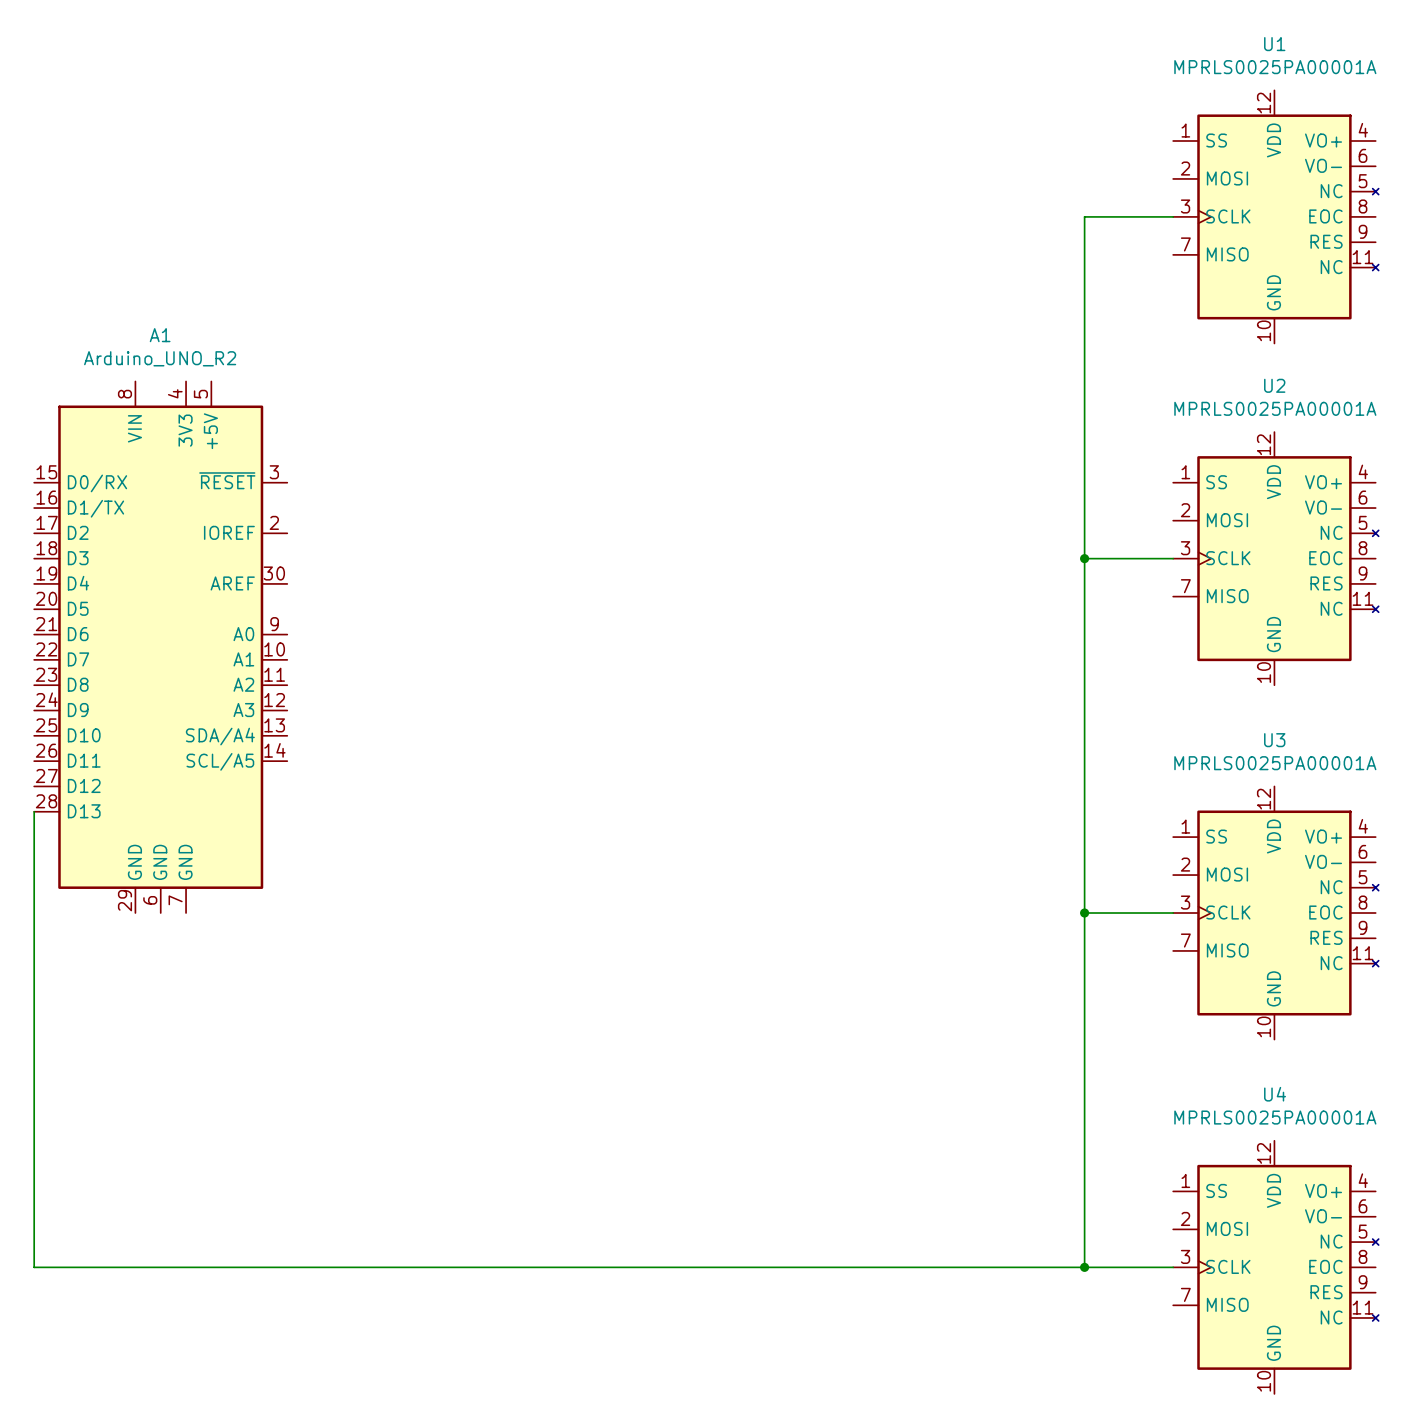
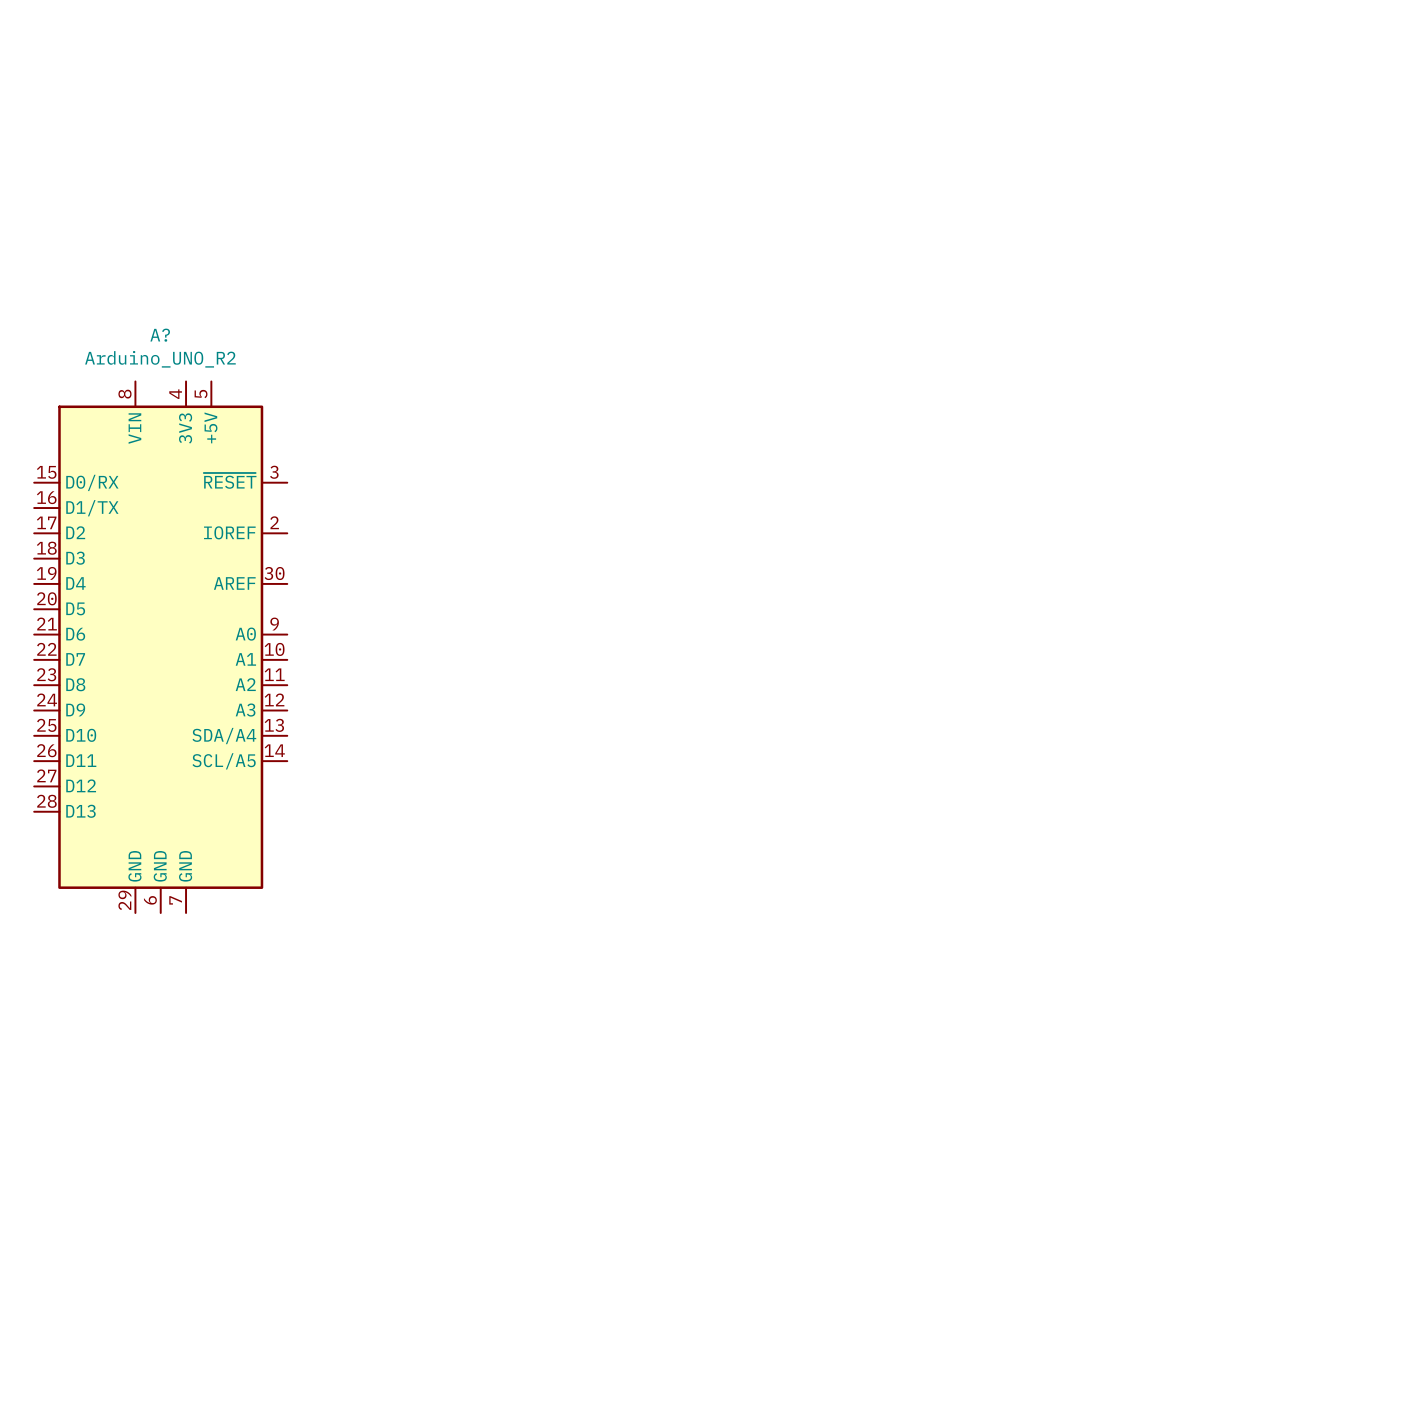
wire: (1173, 216) (1084, 216) (1084, 1267) -> none
U1: MPRLS0025PA00001A (1275, 216) -> none
A1 name: A1 (160, 335) -> A? (160, 335)
wire: (1084, 558) (1173, 558) -> none
junction: (1084, 558) -> none
U2: MPRLS0025PA00001A (1275, 558) -> none
wire: (34, 811) (34, 1267) (1173, 1267) -> none
wire: (1084, 913) (1173, 913) -> none
junction: (1084, 913) -> none
U3: MPRLS0025PA00001A (1275, 913) -> none
junction: (1084, 1267) -> none
U4: MPRLS0025PA00001A (1275, 1267) -> none

